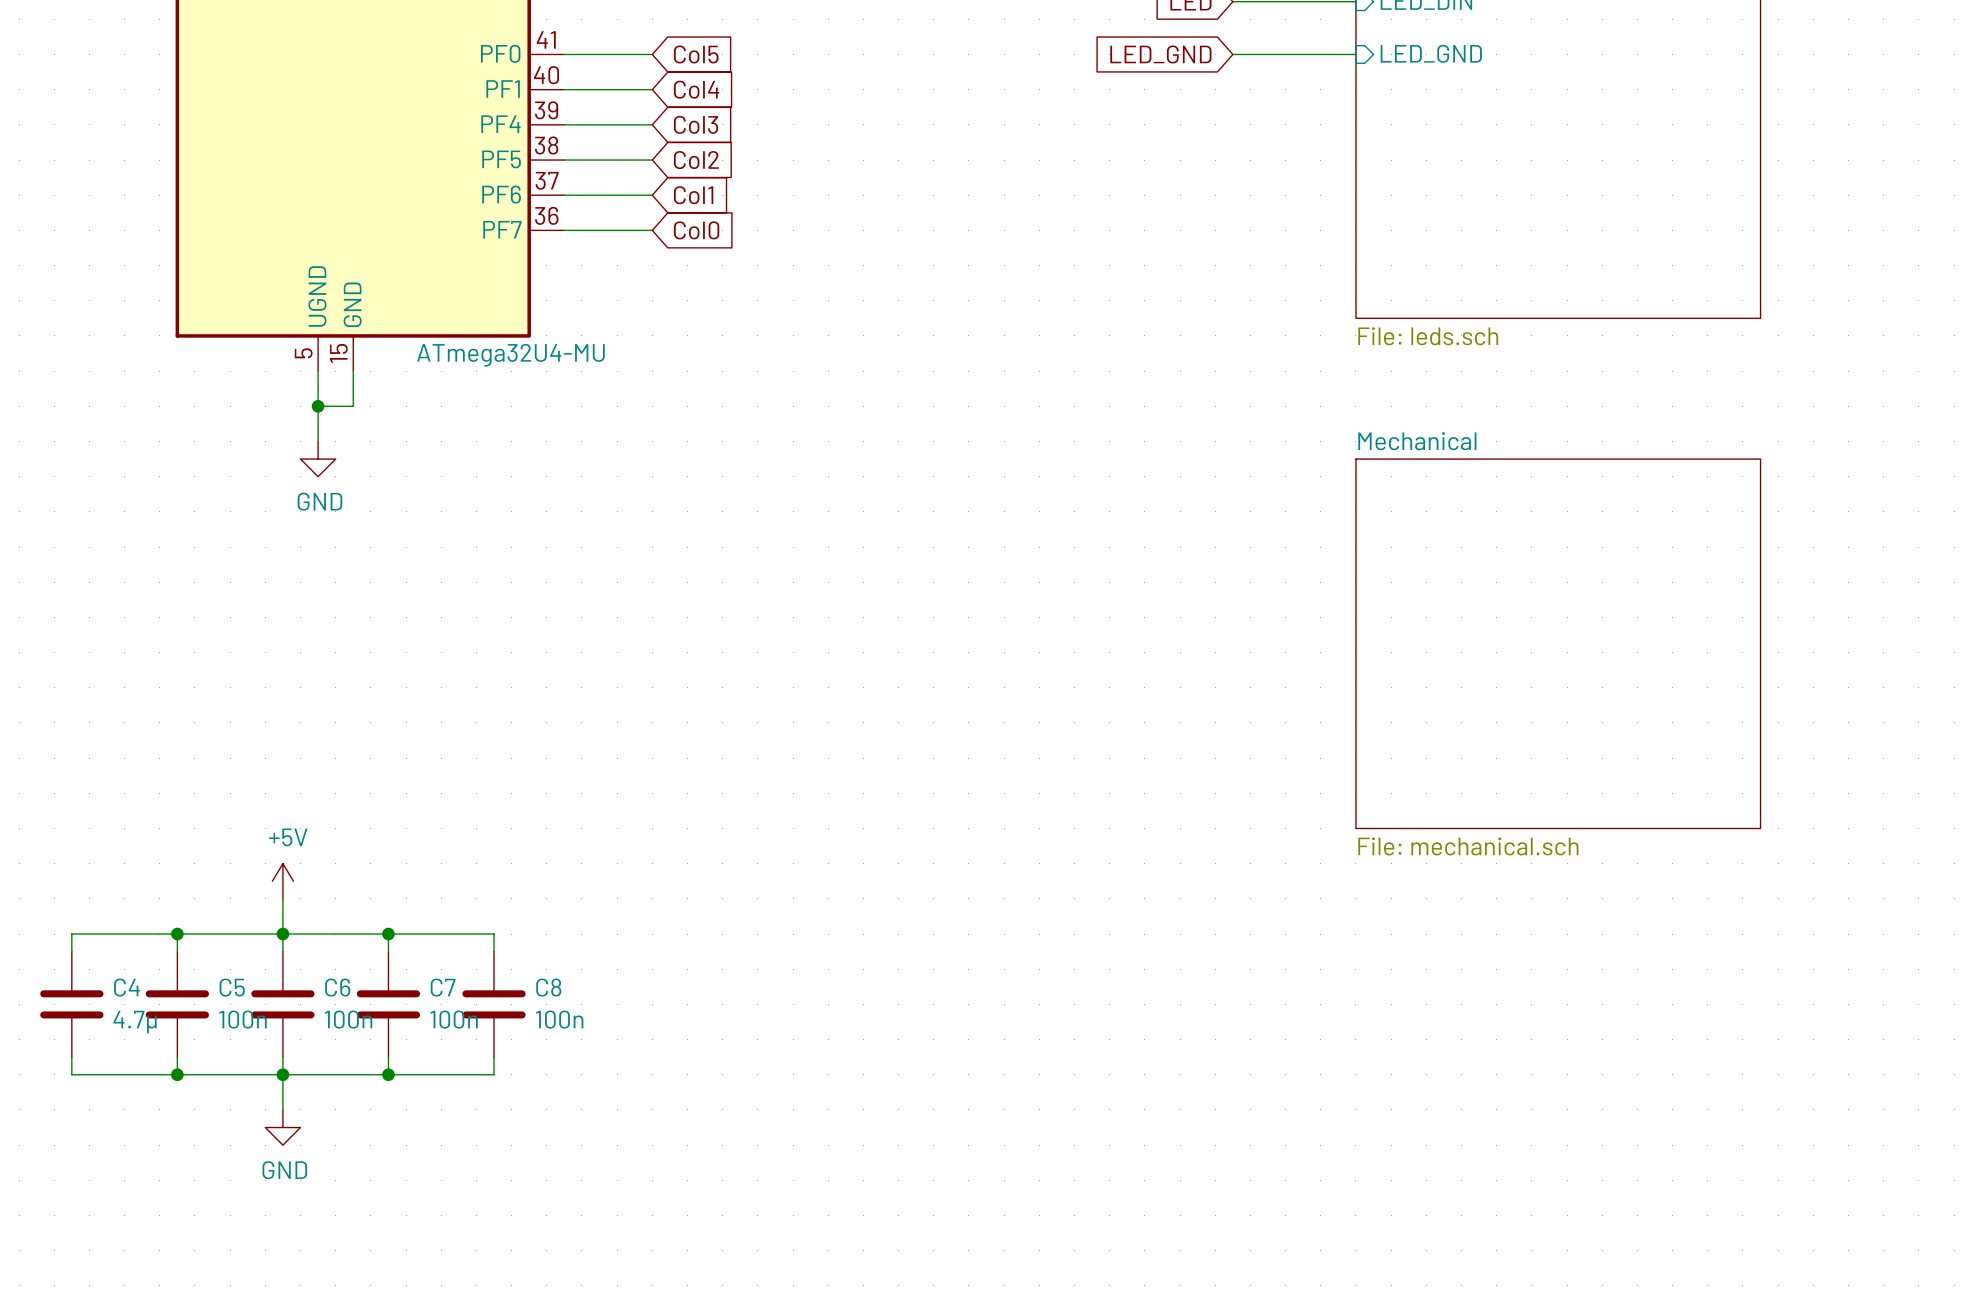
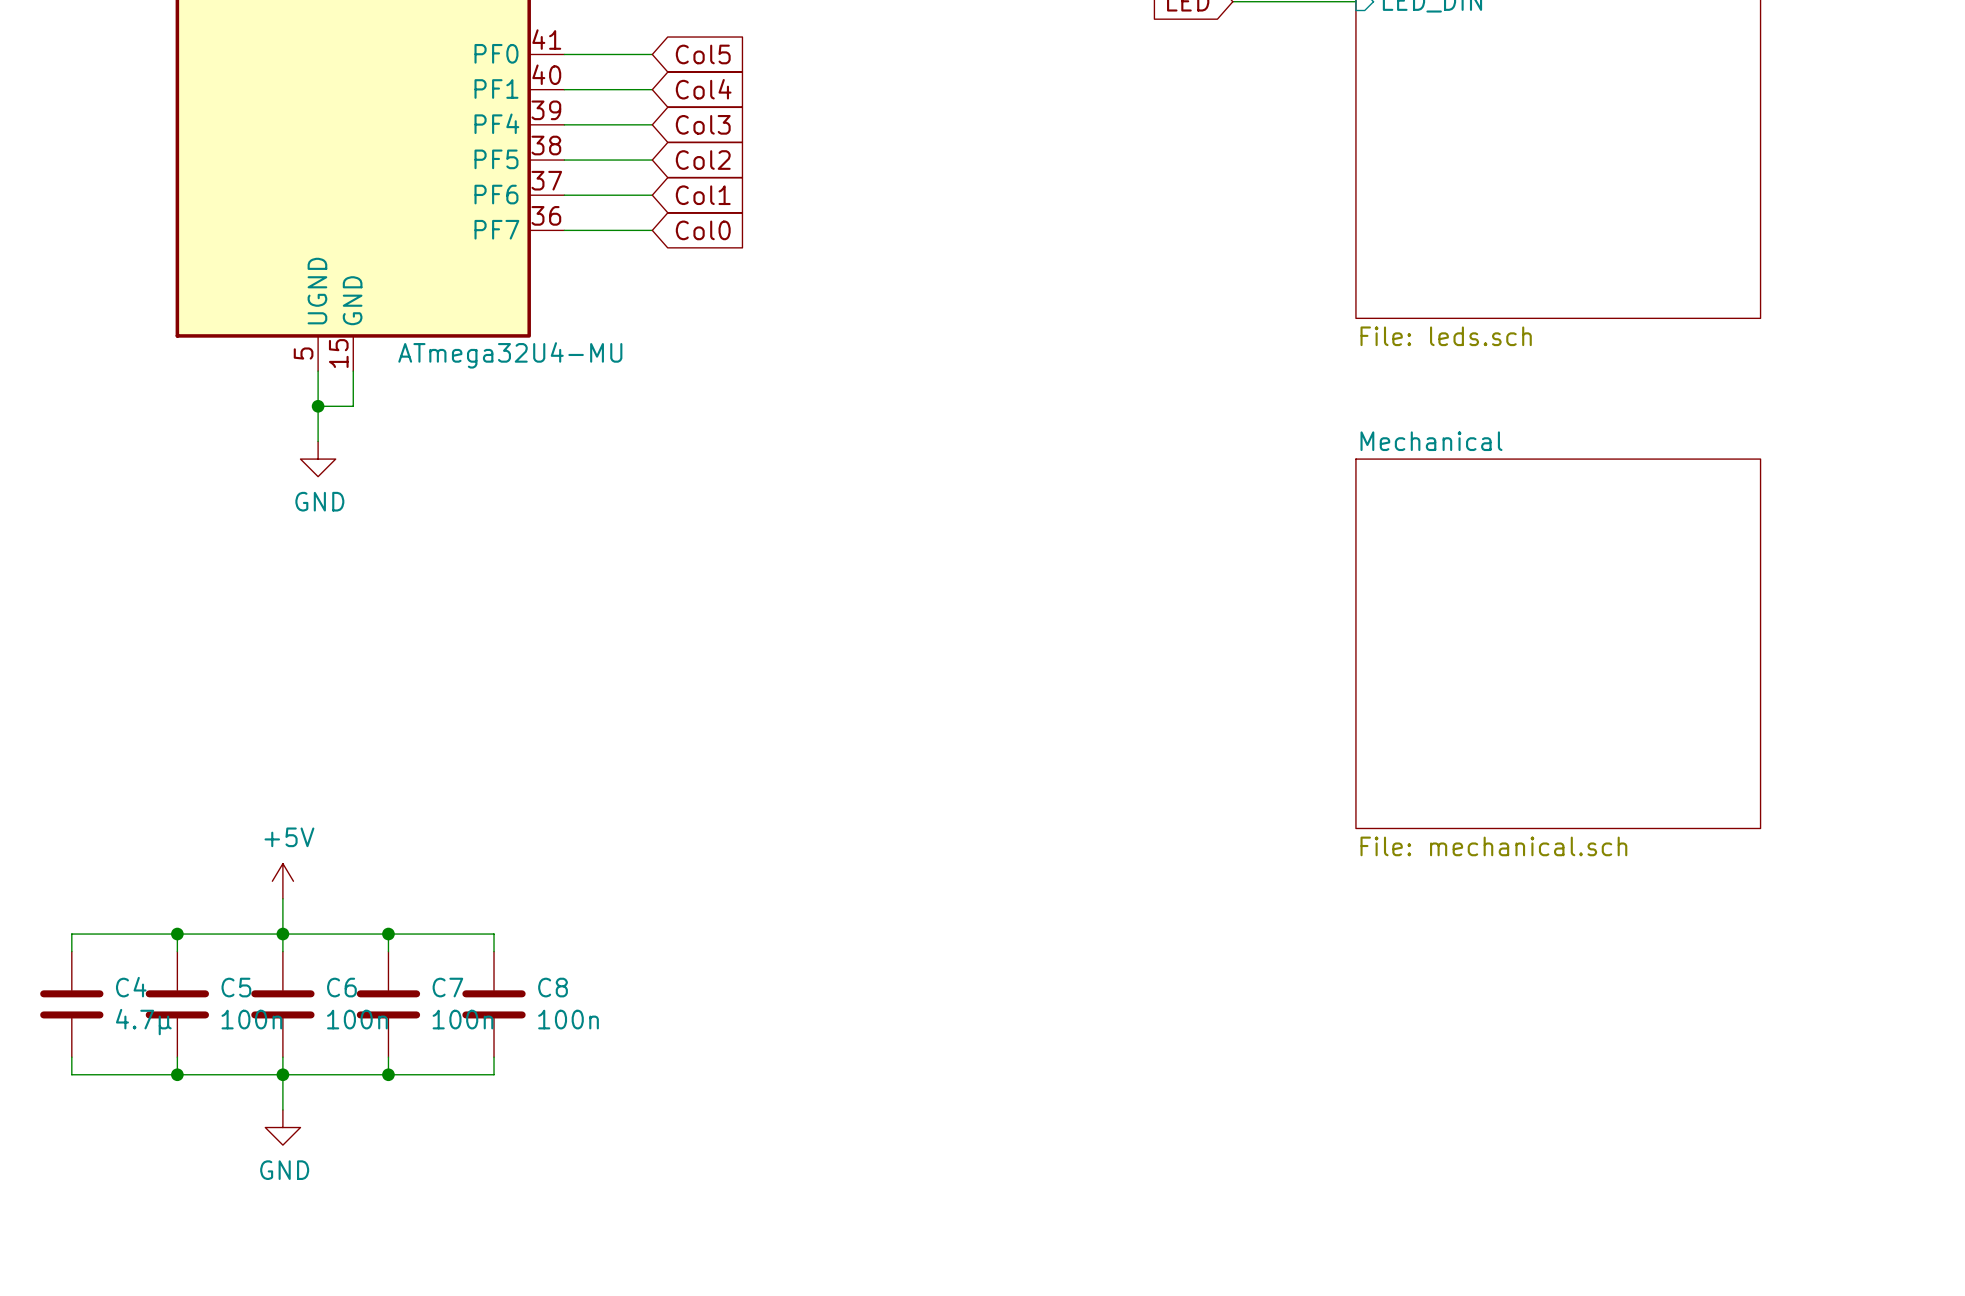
sheet pin: LED_GND (1431, 53) -> none
global label: LED_GND (1160, 54) -> none
wire: (1232, 54) (1355, 54) -> none

